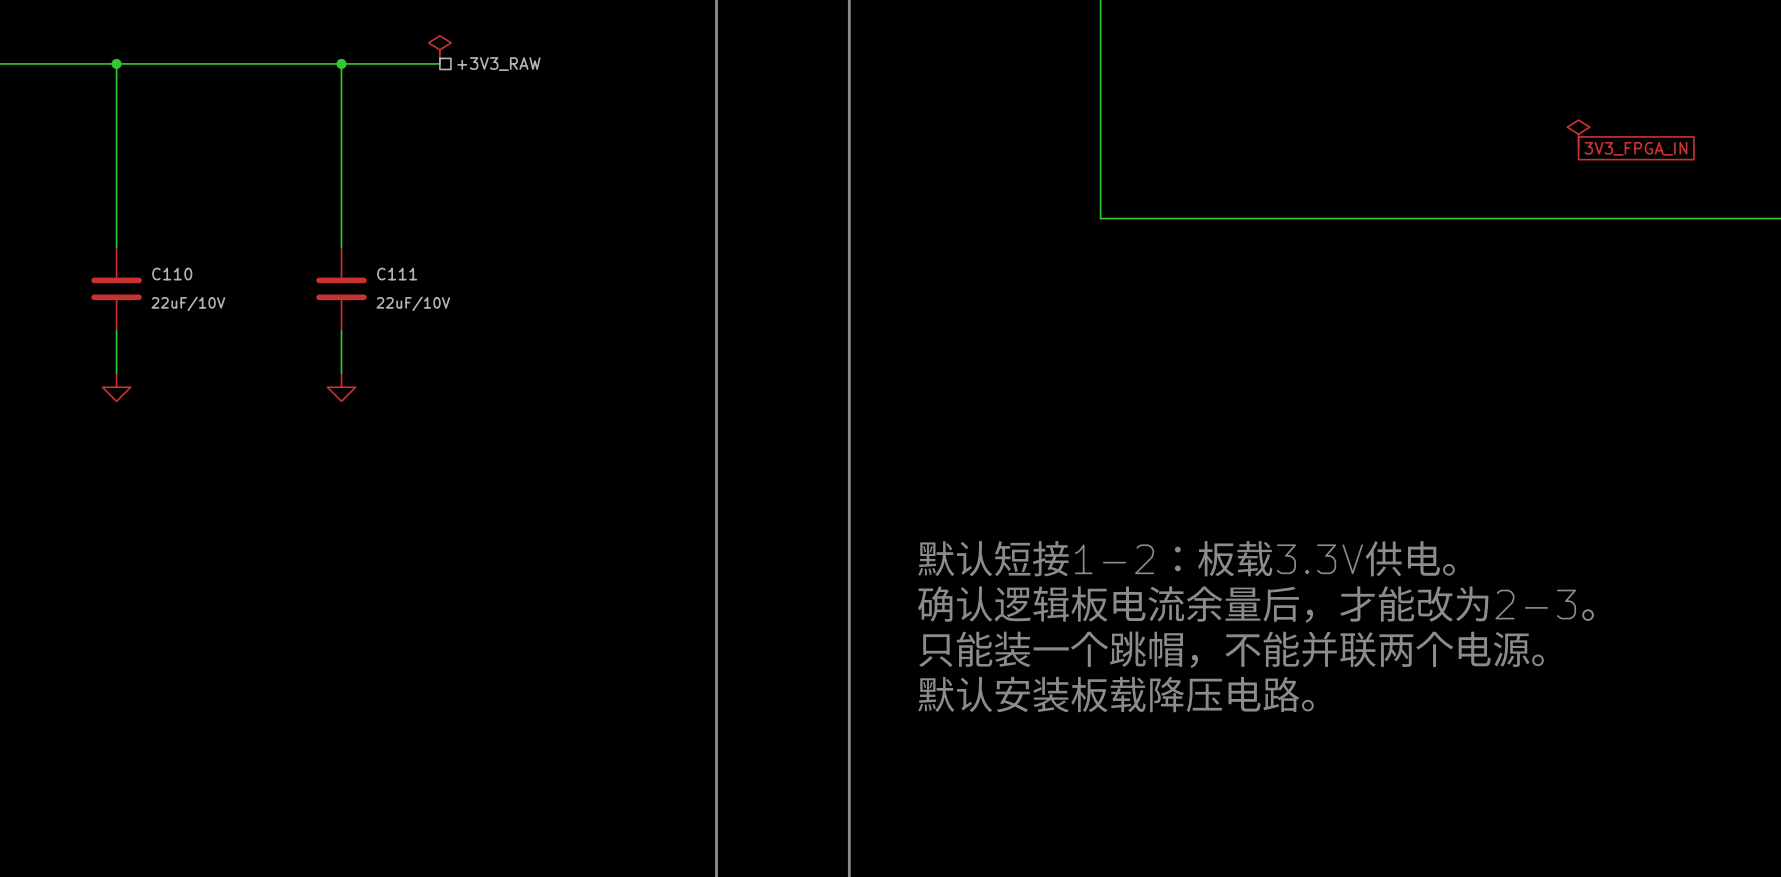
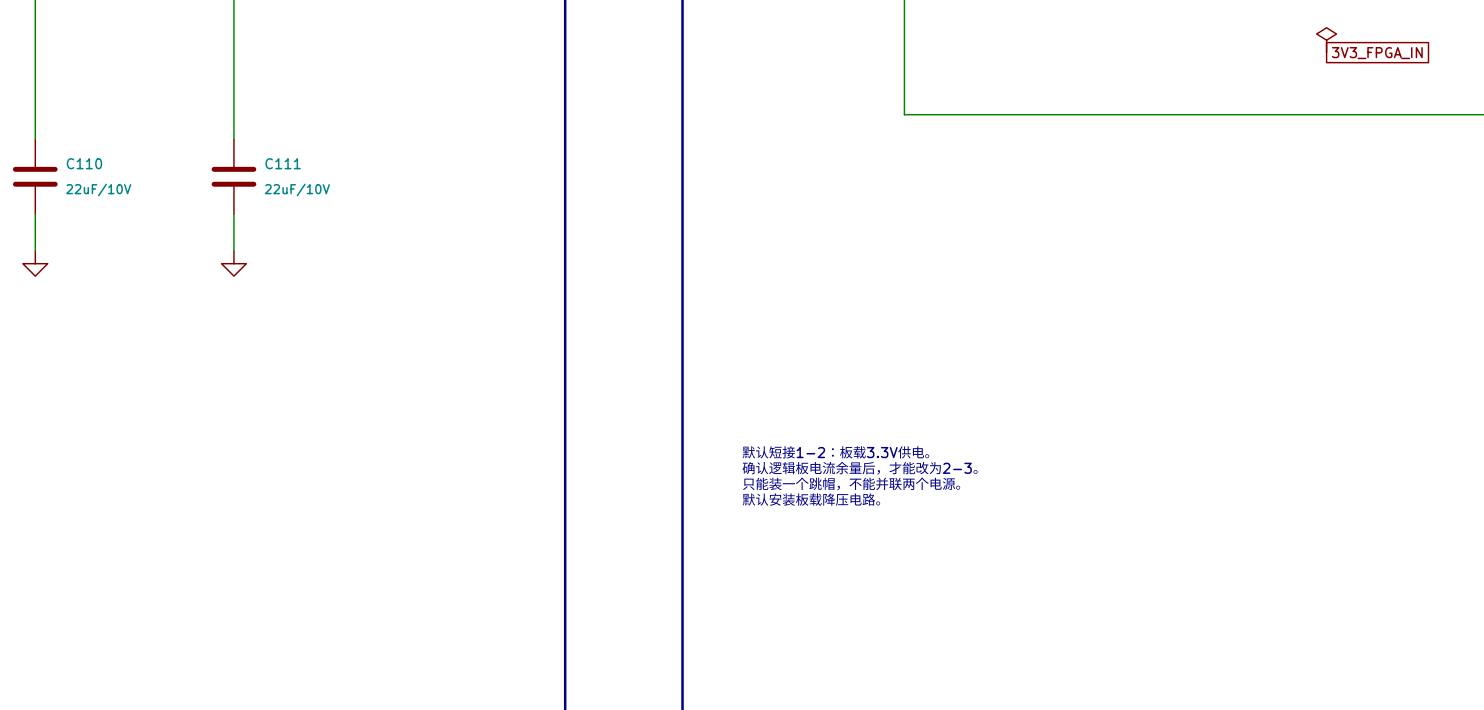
text: 默认短接1-2：板载3.3V供电。 (1186, 558) -> none
text: 确认逻辑板电流余量后，才能改为2-3。 (1255, 604) -> 默认短接1-2：板载3.3V供电。 (835, 452)
text: none -> 确认逻辑板电流余量后，才能改为2-3。 (860, 468)
text: none -> 只能装一个跳帽，不能并联两个电源。 (851, 484)
text: 只能装一个跳帽，不能并联两个电源。 (1231, 649) -> 默认安装板载降压电路。 (811, 499)
text: 默认安装板载降压电路。 (1115, 694) -> none

